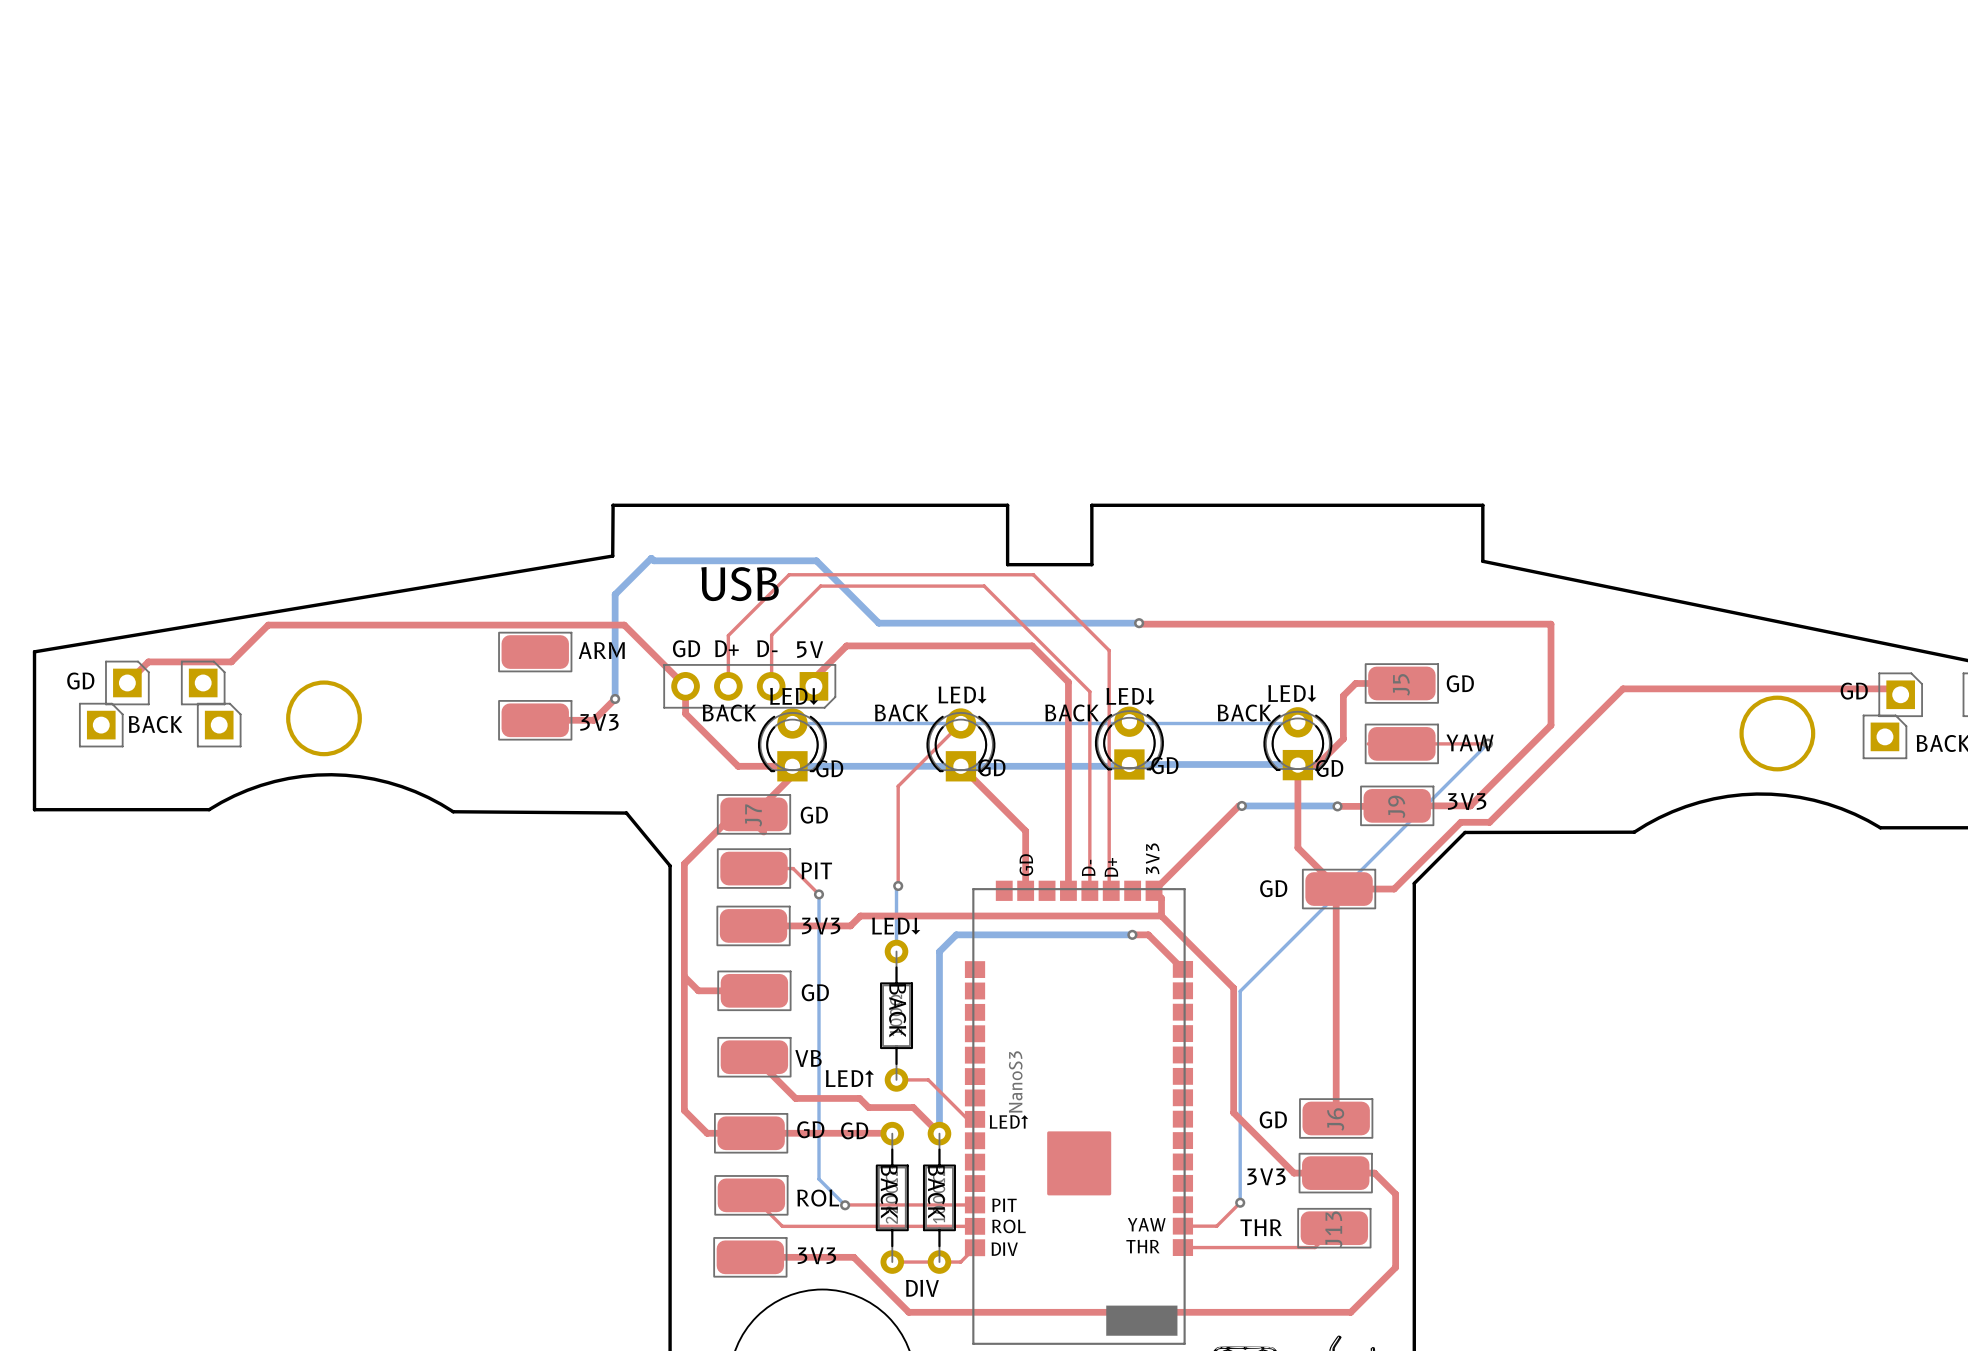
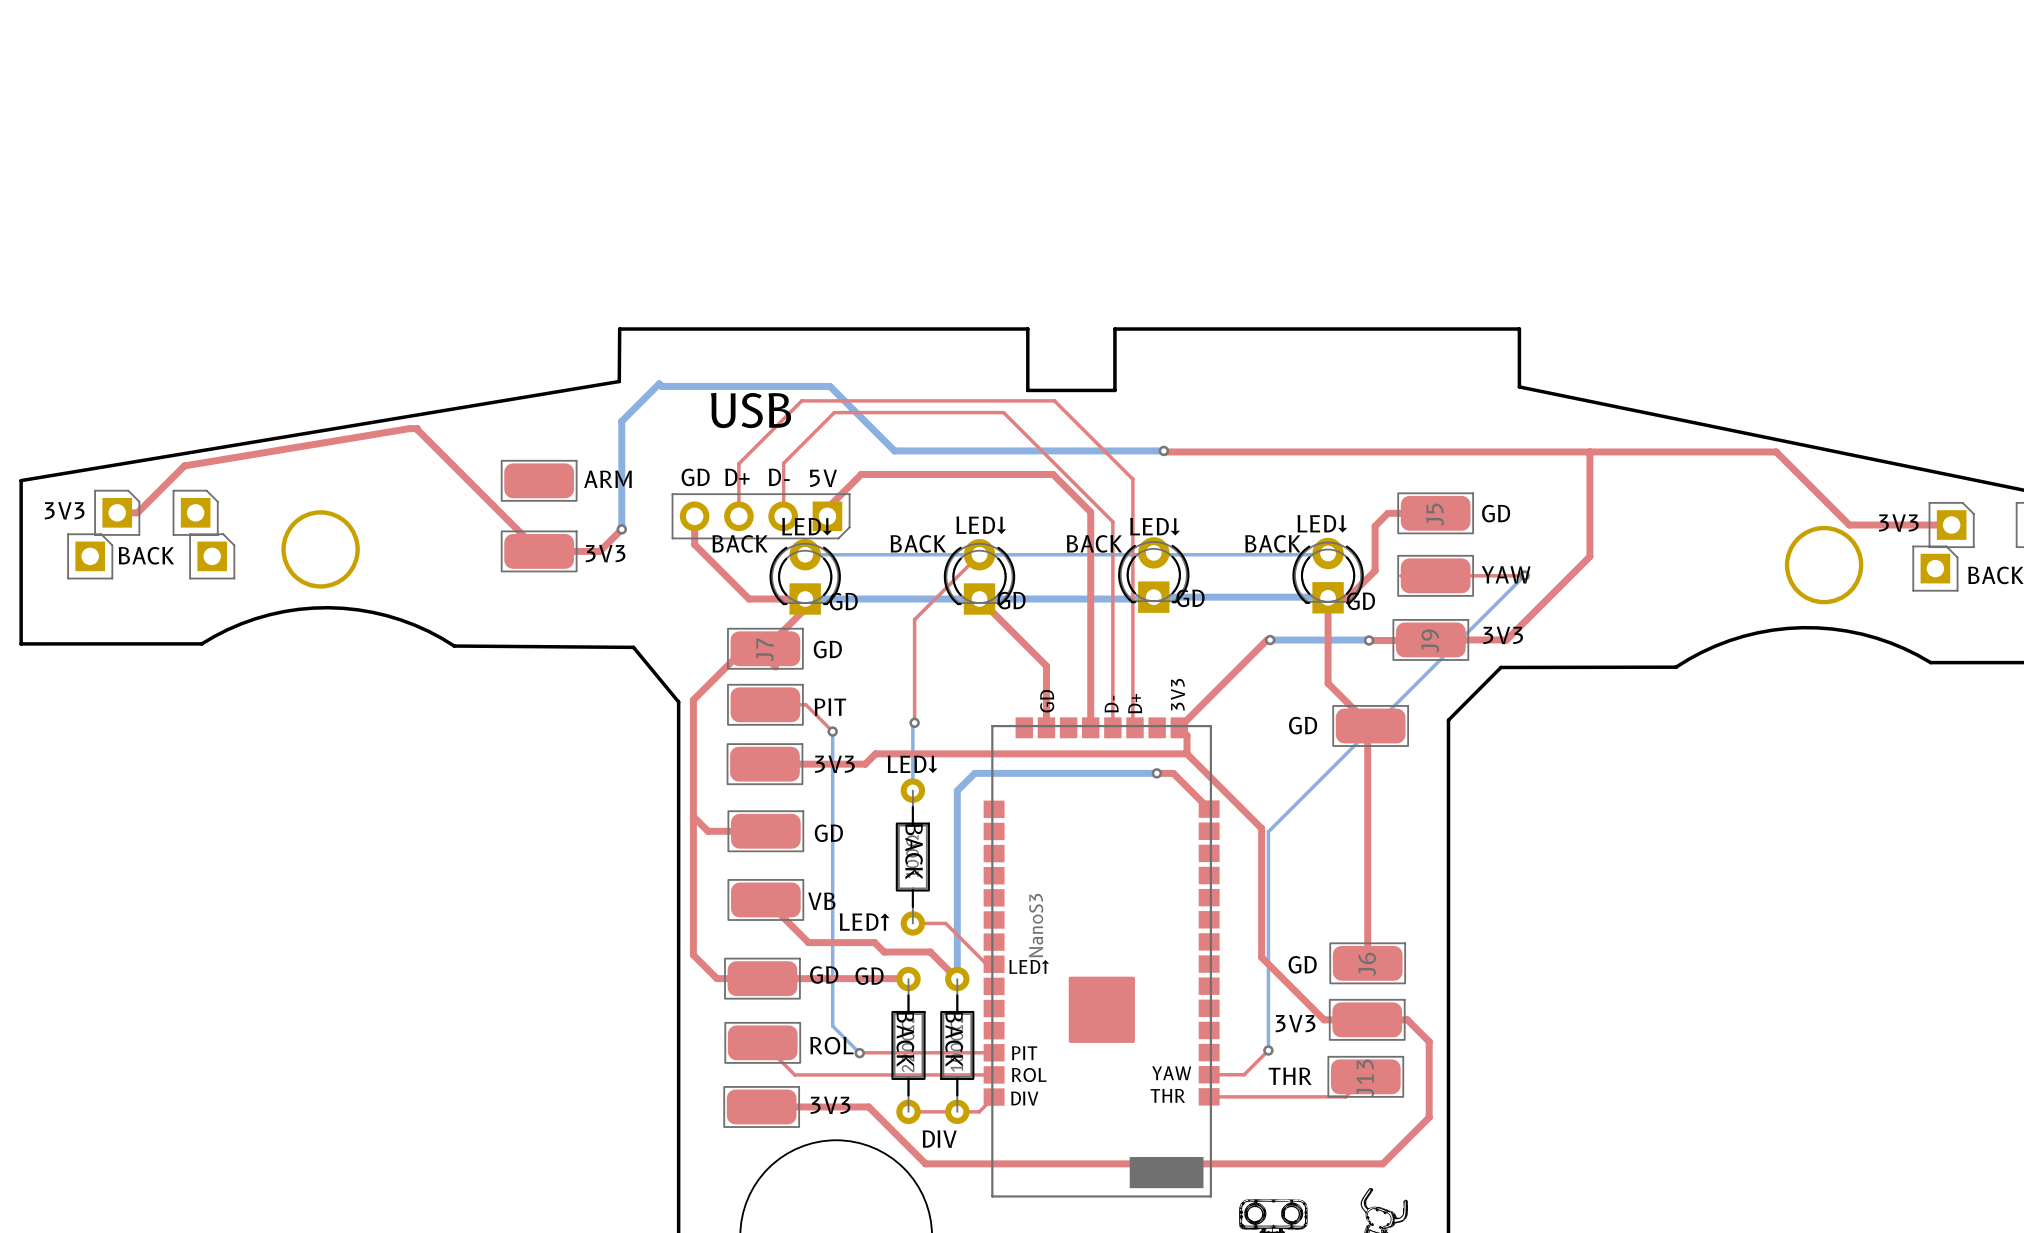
top track: none -> (1589, 451) (1776, 451) (1849, 525) (1951, 525)
text: GD (80, 681) -> 3V3 (64, 510)
top track: (127, 682) (148, 661) (231, 661) (268, 625) (624, 625) (685, 686) -> (117, 512) (137, 512) (184, 465) (417, 428) (539, 551)
top track: (1896, 690) (1900, 694) (1894, 688) (1623, 688) (1489, 822) (1460, 822) (1394, 889) (1355, 889) -> none
text: GD (1854, 691) -> 3V3 (1898, 522)

